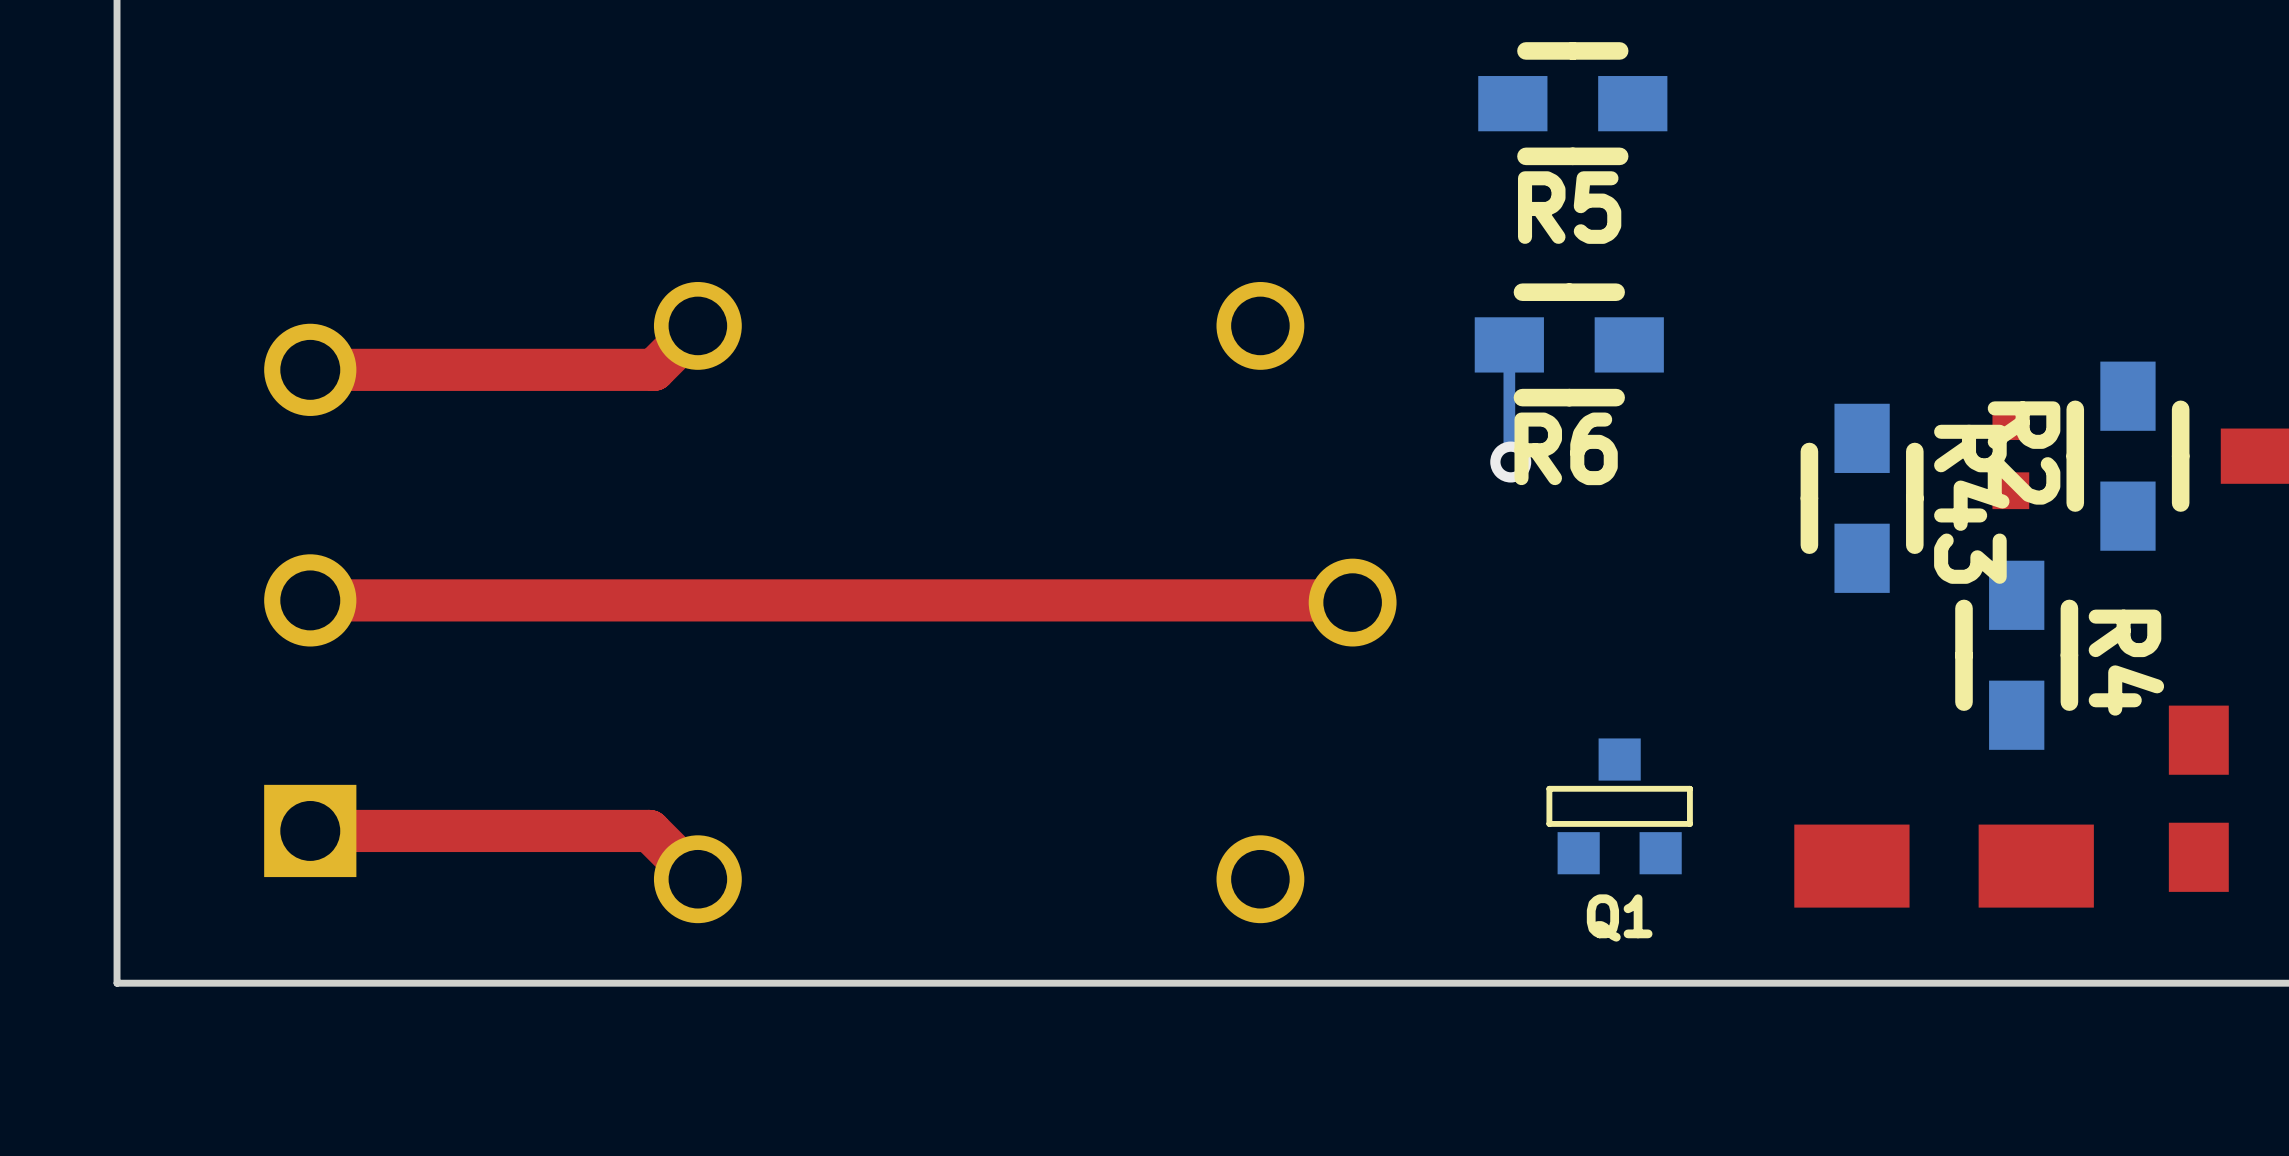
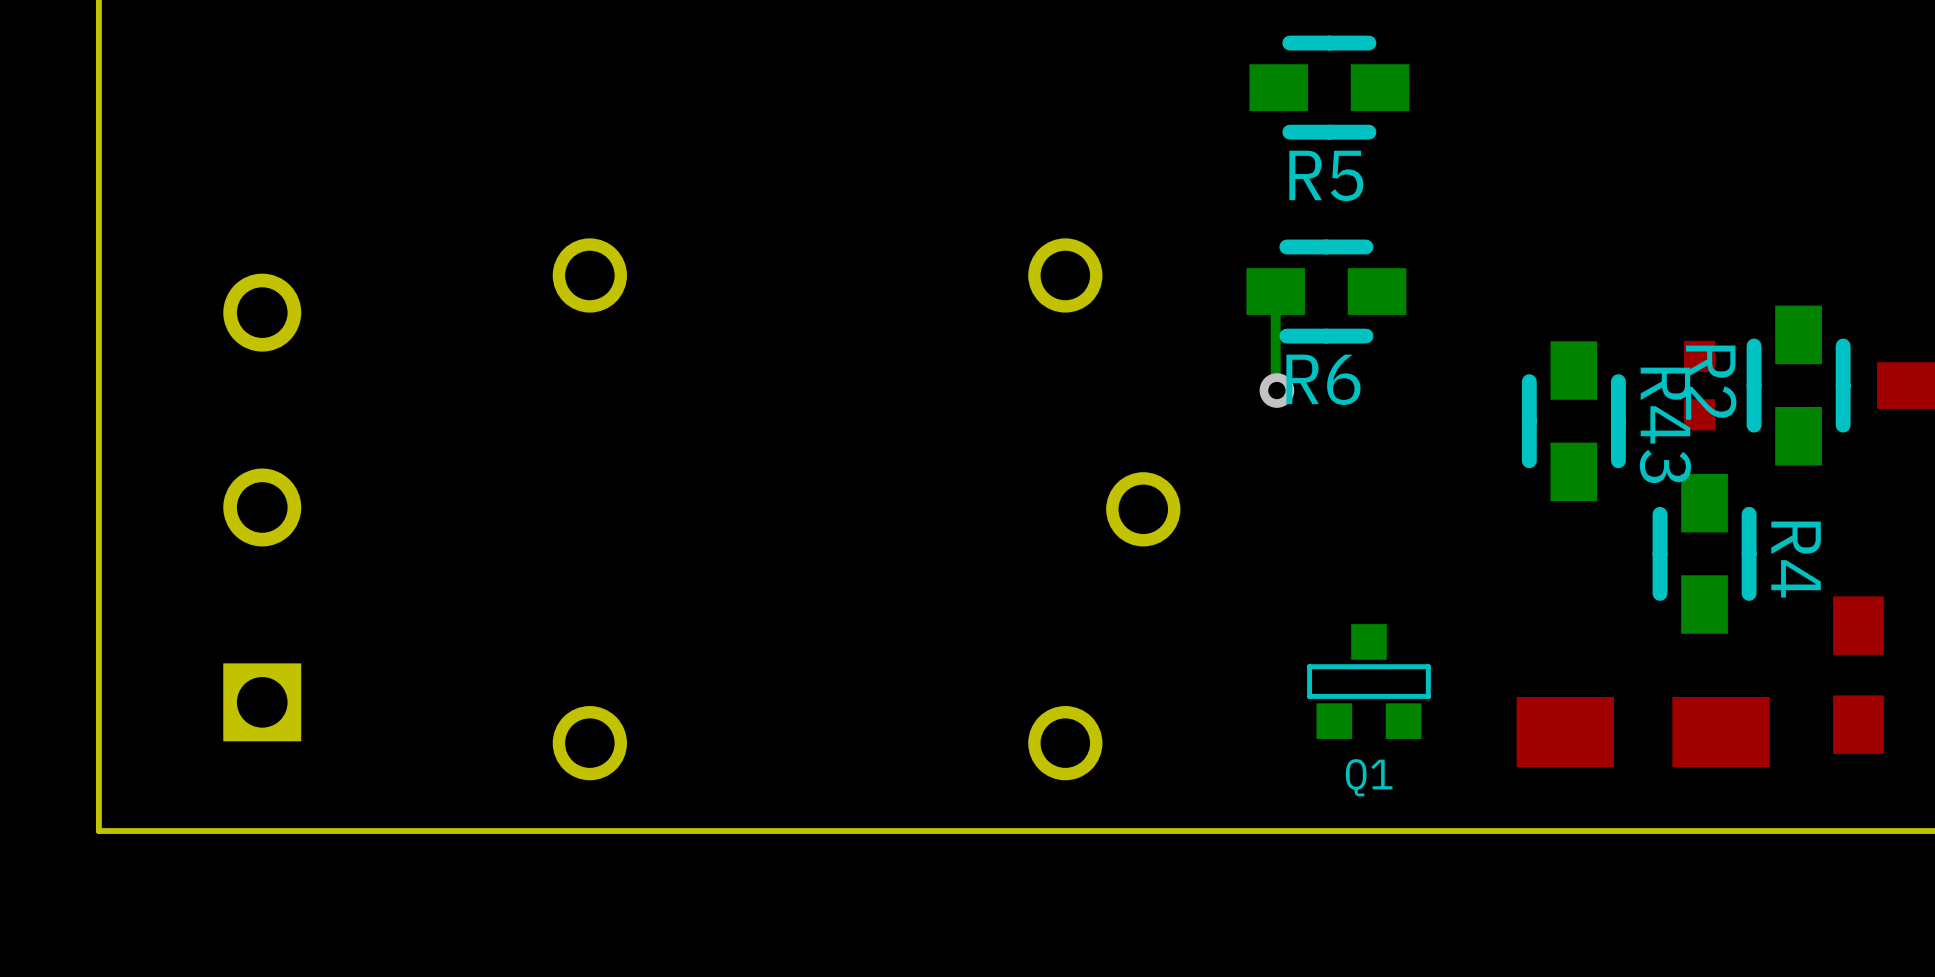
top track: (697, 325) (653, 369) (310, 369) -> none
top track: (310, 600) (1350, 600) (1352, 602) -> none
top track: (310, 830) (649, 830) (697, 879) -> none

